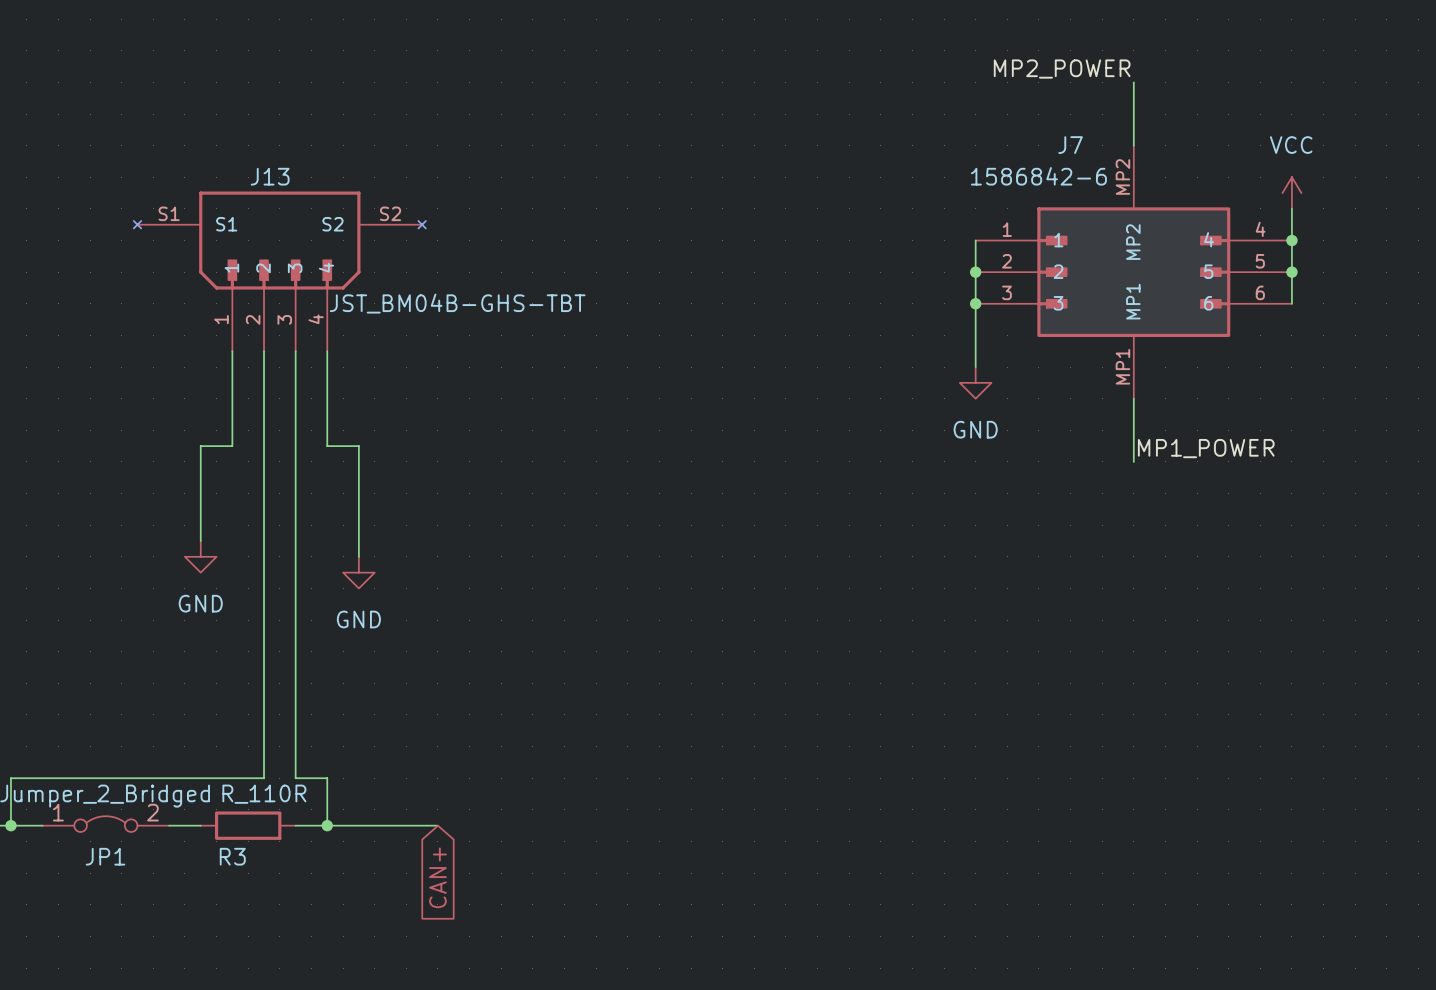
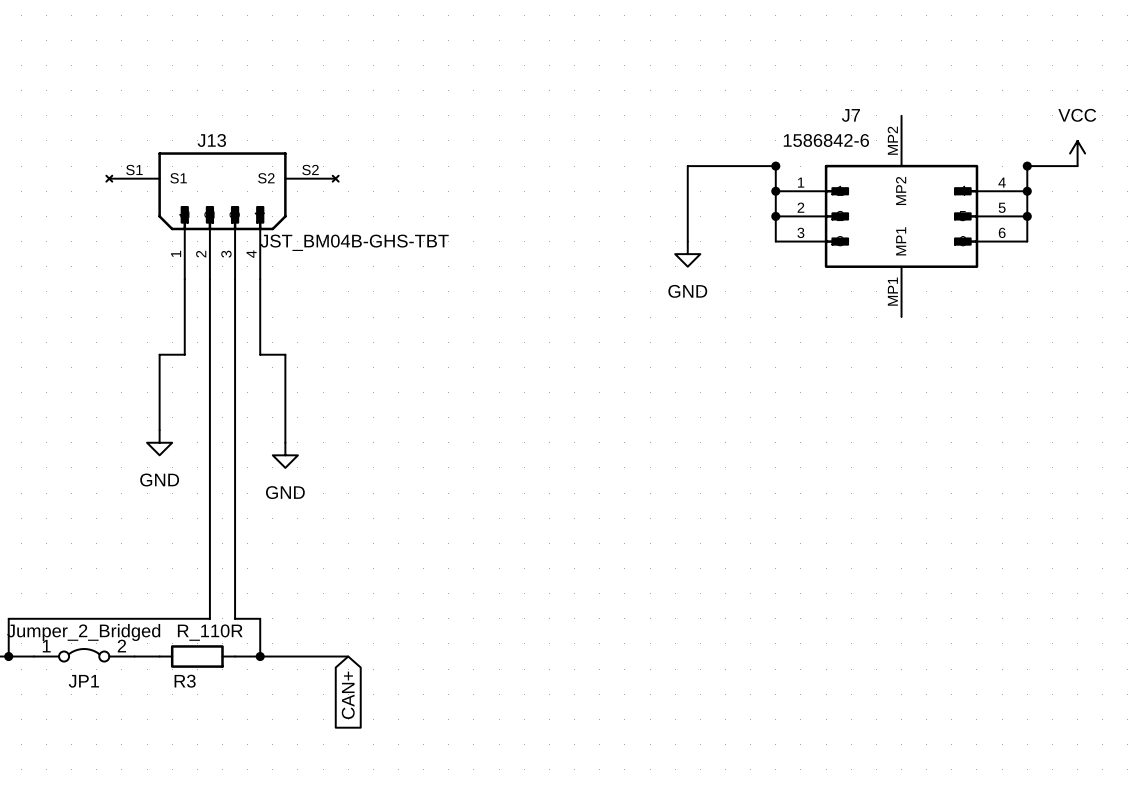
label: MP2_POWER (1062, 69) -> none
wire: (1133, 82) (1133, 145) -> none
power symbol position: VCC (1291, 193) -> VCC (1077, 153)
junction: none -> (775, 166)
wire: none -> (1027, 166) (1077, 166)
junction: none -> (1027, 166)
wire: none -> (775, 191) (775, 166) (687, 166) (687, 241)
junction: none -> (775, 191)
wire: (975, 303) (975, 367) -> none
junction: (975, 303) -> none
power symbol position: GND (975, 382) -> GND (687, 254)
wire: (1133, 398) (1133, 461) -> none
label: MP1_POWER (1206, 448) -> none

